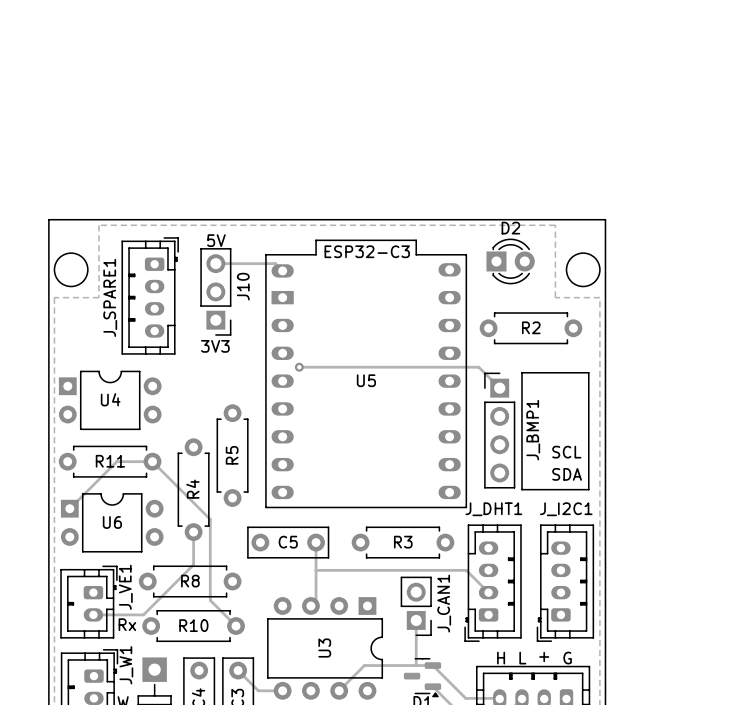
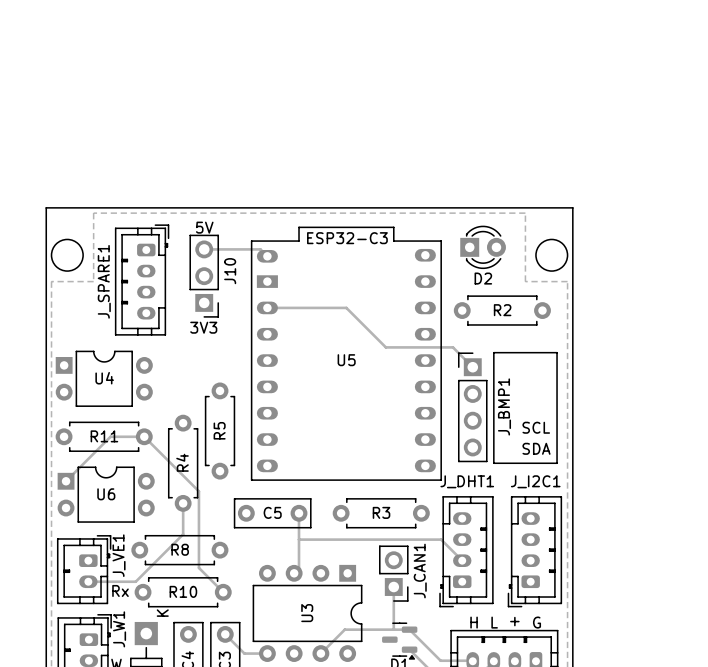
D2 name position: D2 (510, 228) -> D2 (483, 278)
track: (299, 367) (407, 367) -> (267, 307) (346, 307) (385, 347)
via: (299, 367) -> none
part text: none -> K (162, 613)

